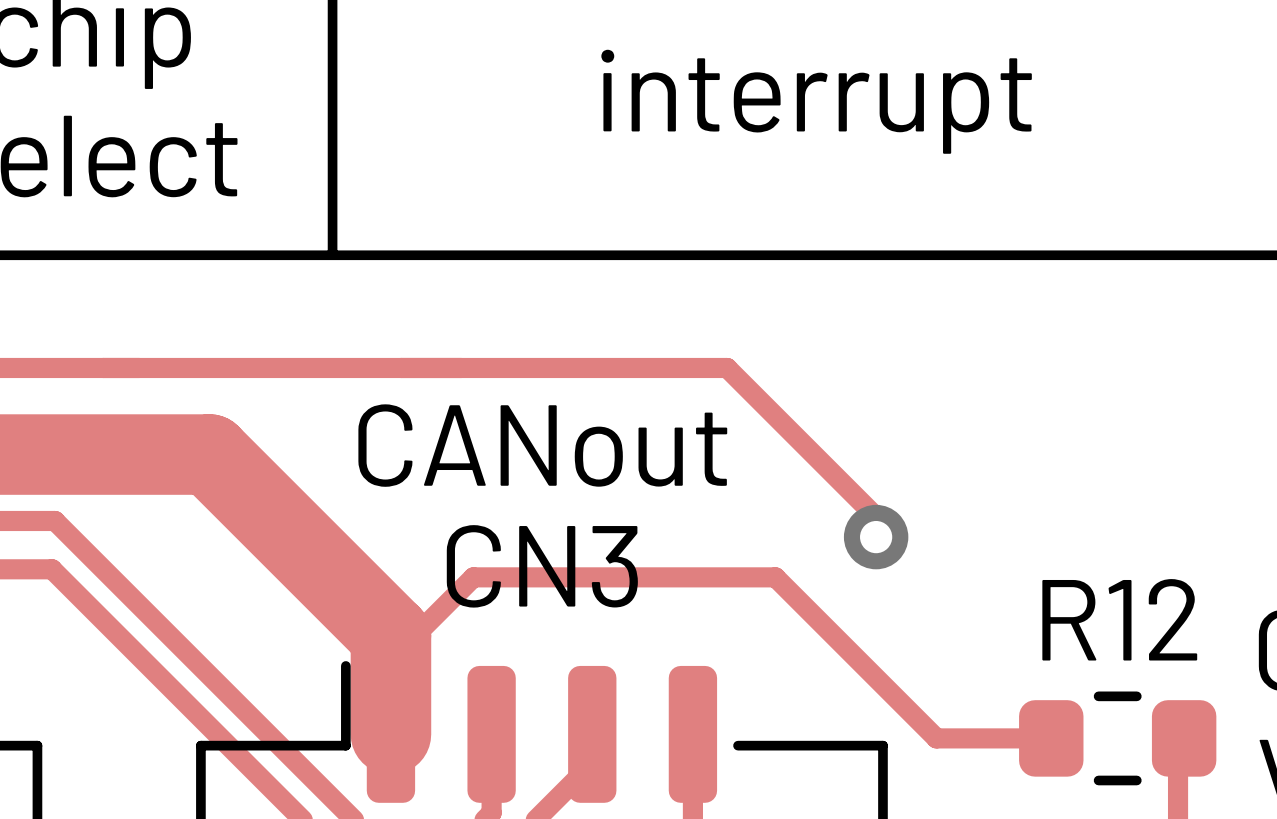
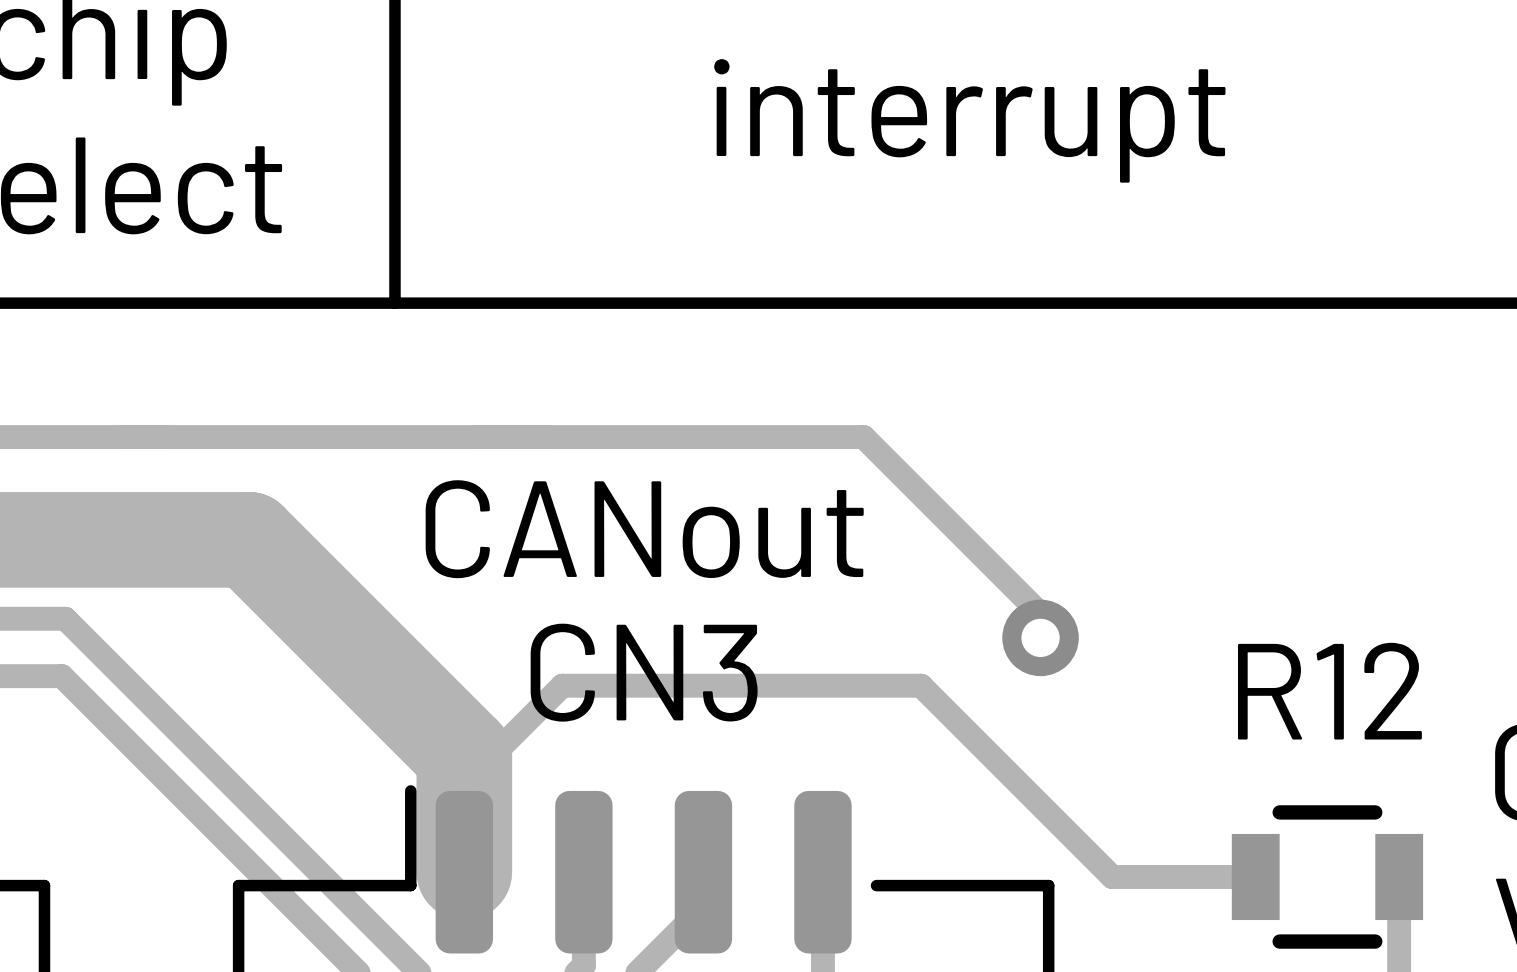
R12 name position: R12 (1119, 619) -> R12 (1329, 691)
R12 footprint: [1019, 691, 1217, 786] -> [1231, 805, 1424, 949]

